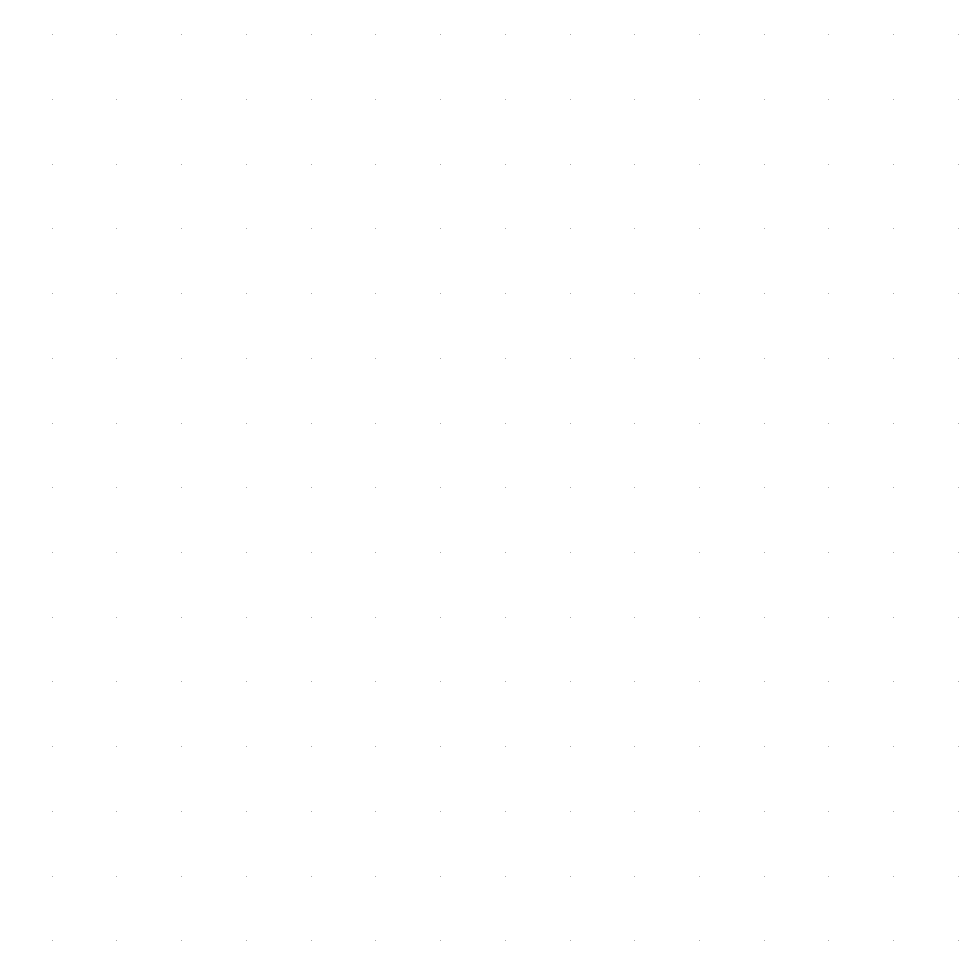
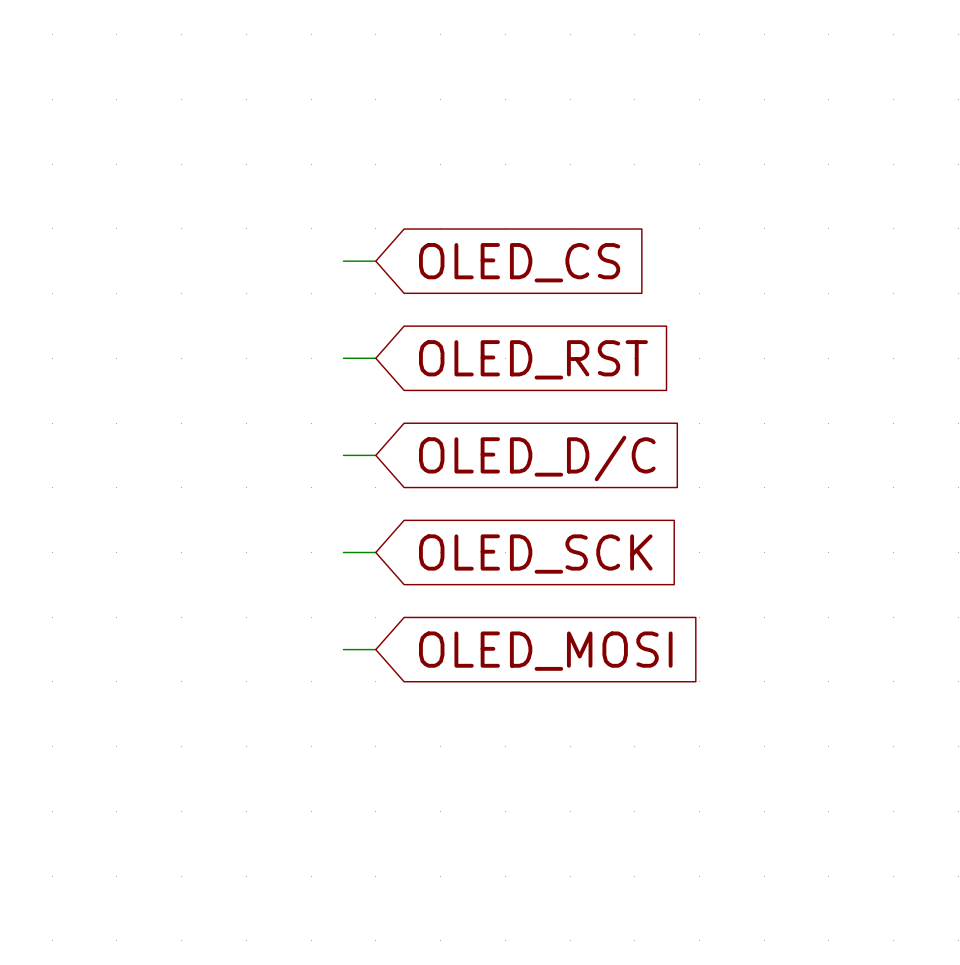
wire: none -> (343, 261) (375, 261)
global label: none -> OLED_CS (519, 262)
wire: none -> (343, 358) (375, 358)
global label: none -> OLED_RST (533, 359)
wire: none -> (343, 455) (375, 455)
global label: none -> OLED_D/C (537, 458)
wire: none -> (343, 552) (375, 552)
global label: none -> OLED_SCK (535, 554)
wire: none -> (343, 649) (375, 649)
global label: none -> OLED_MOSI (545, 651)

